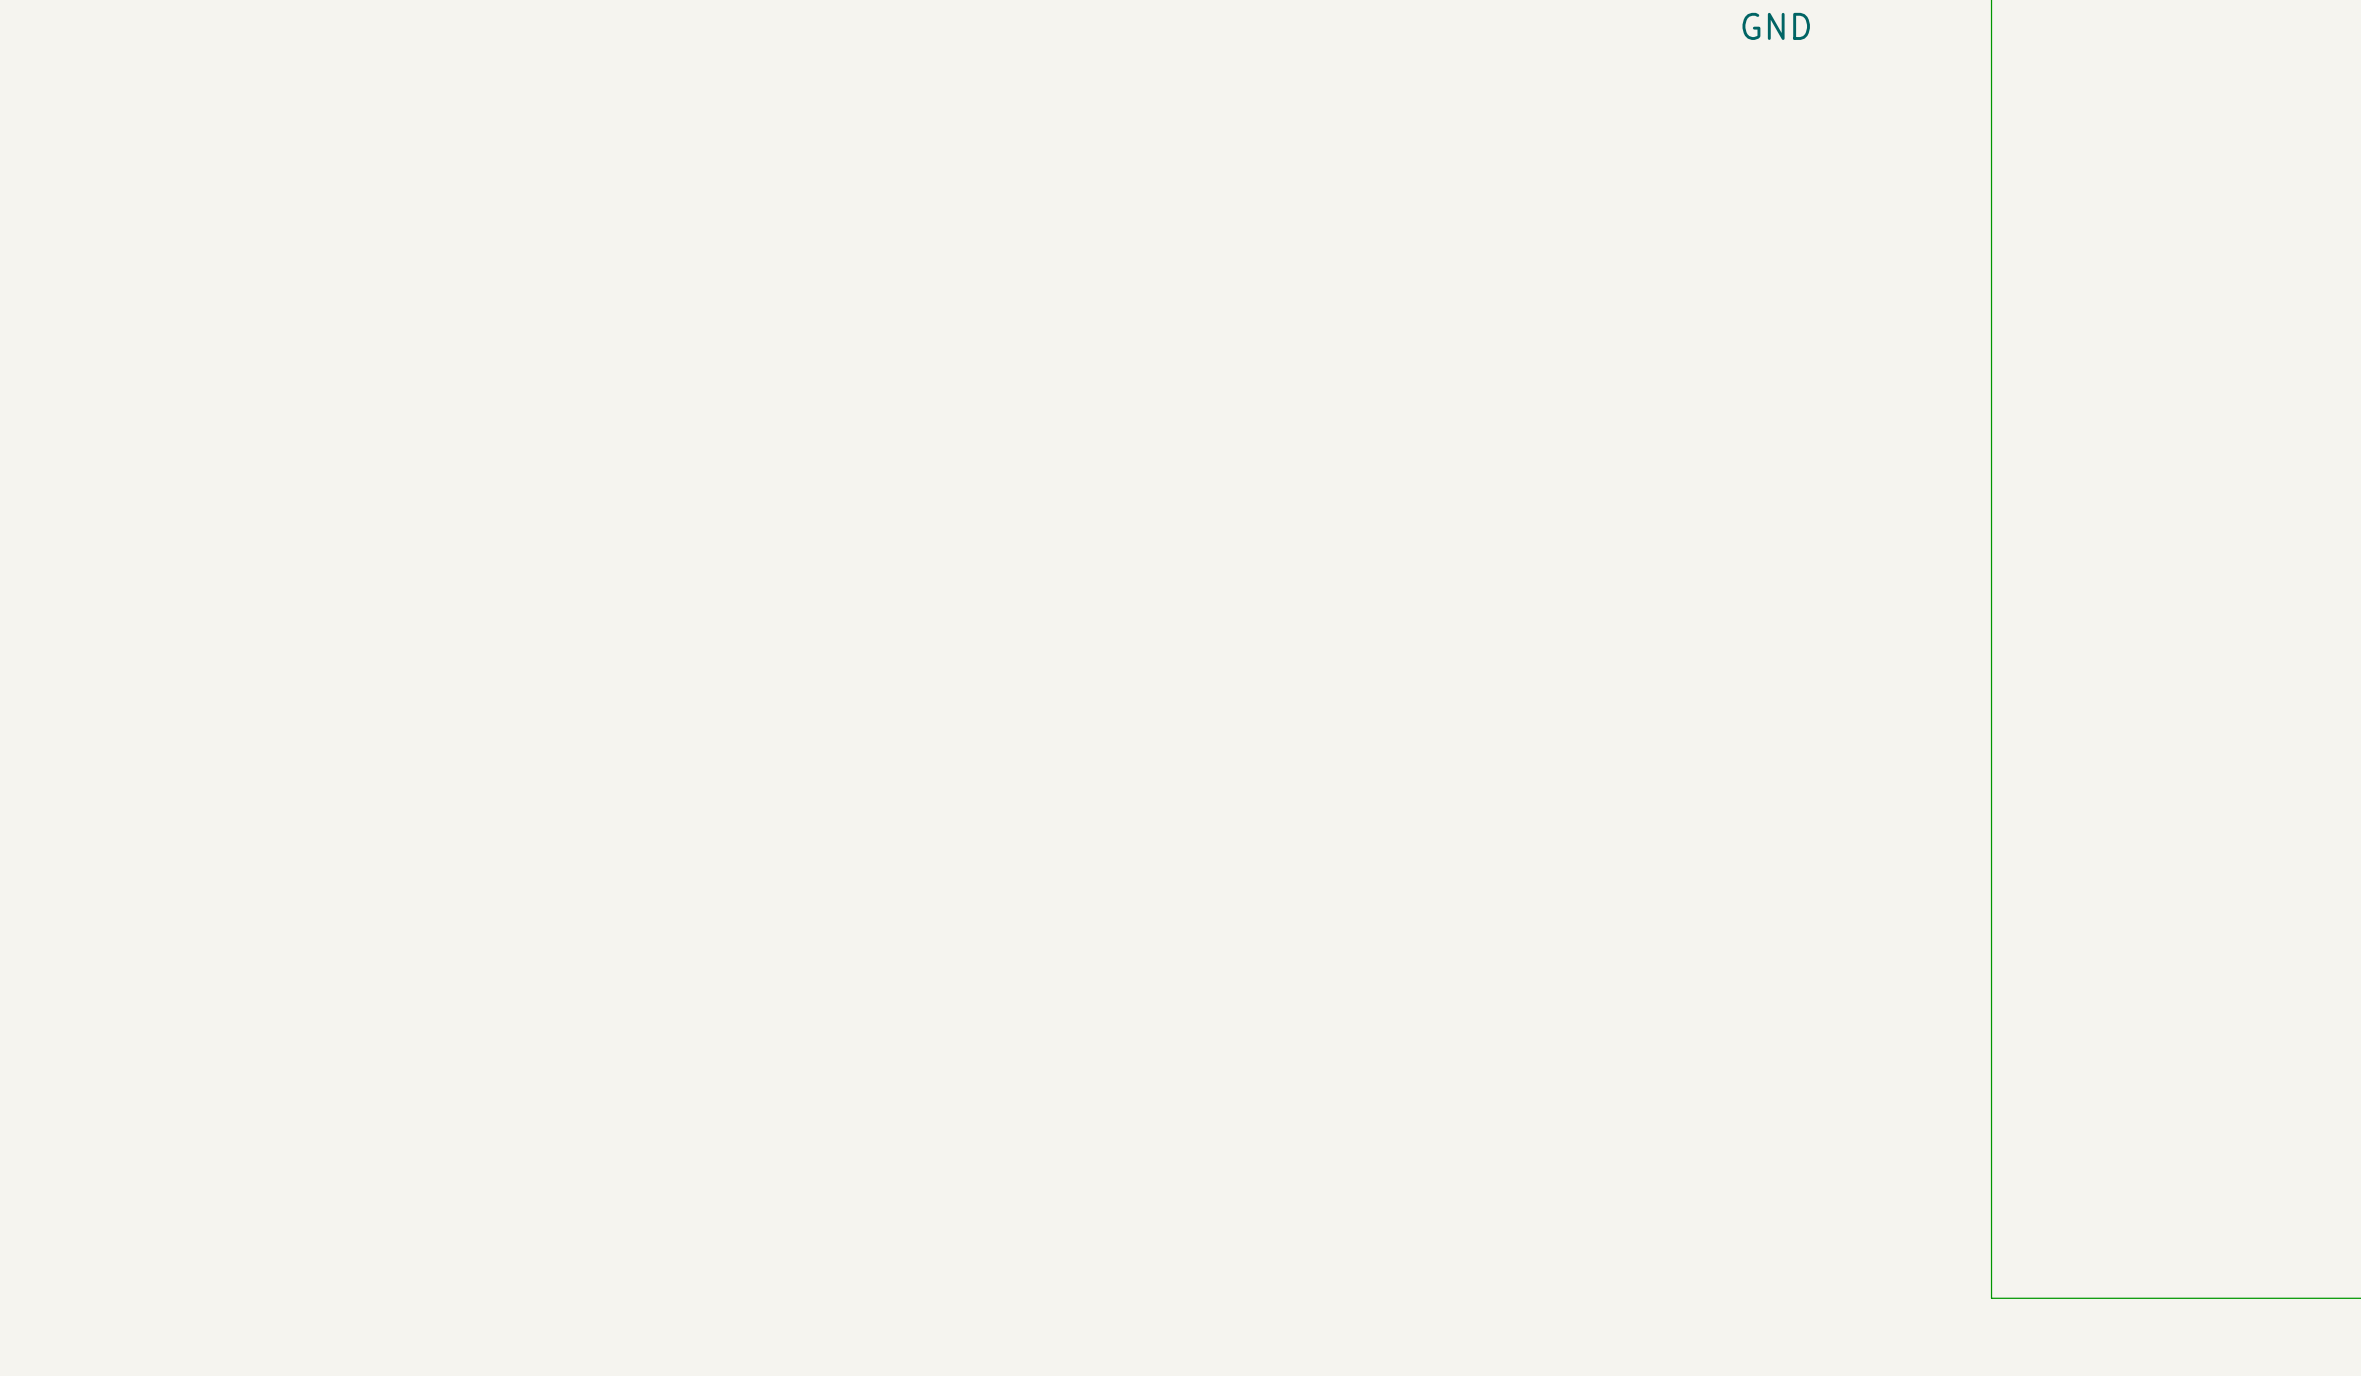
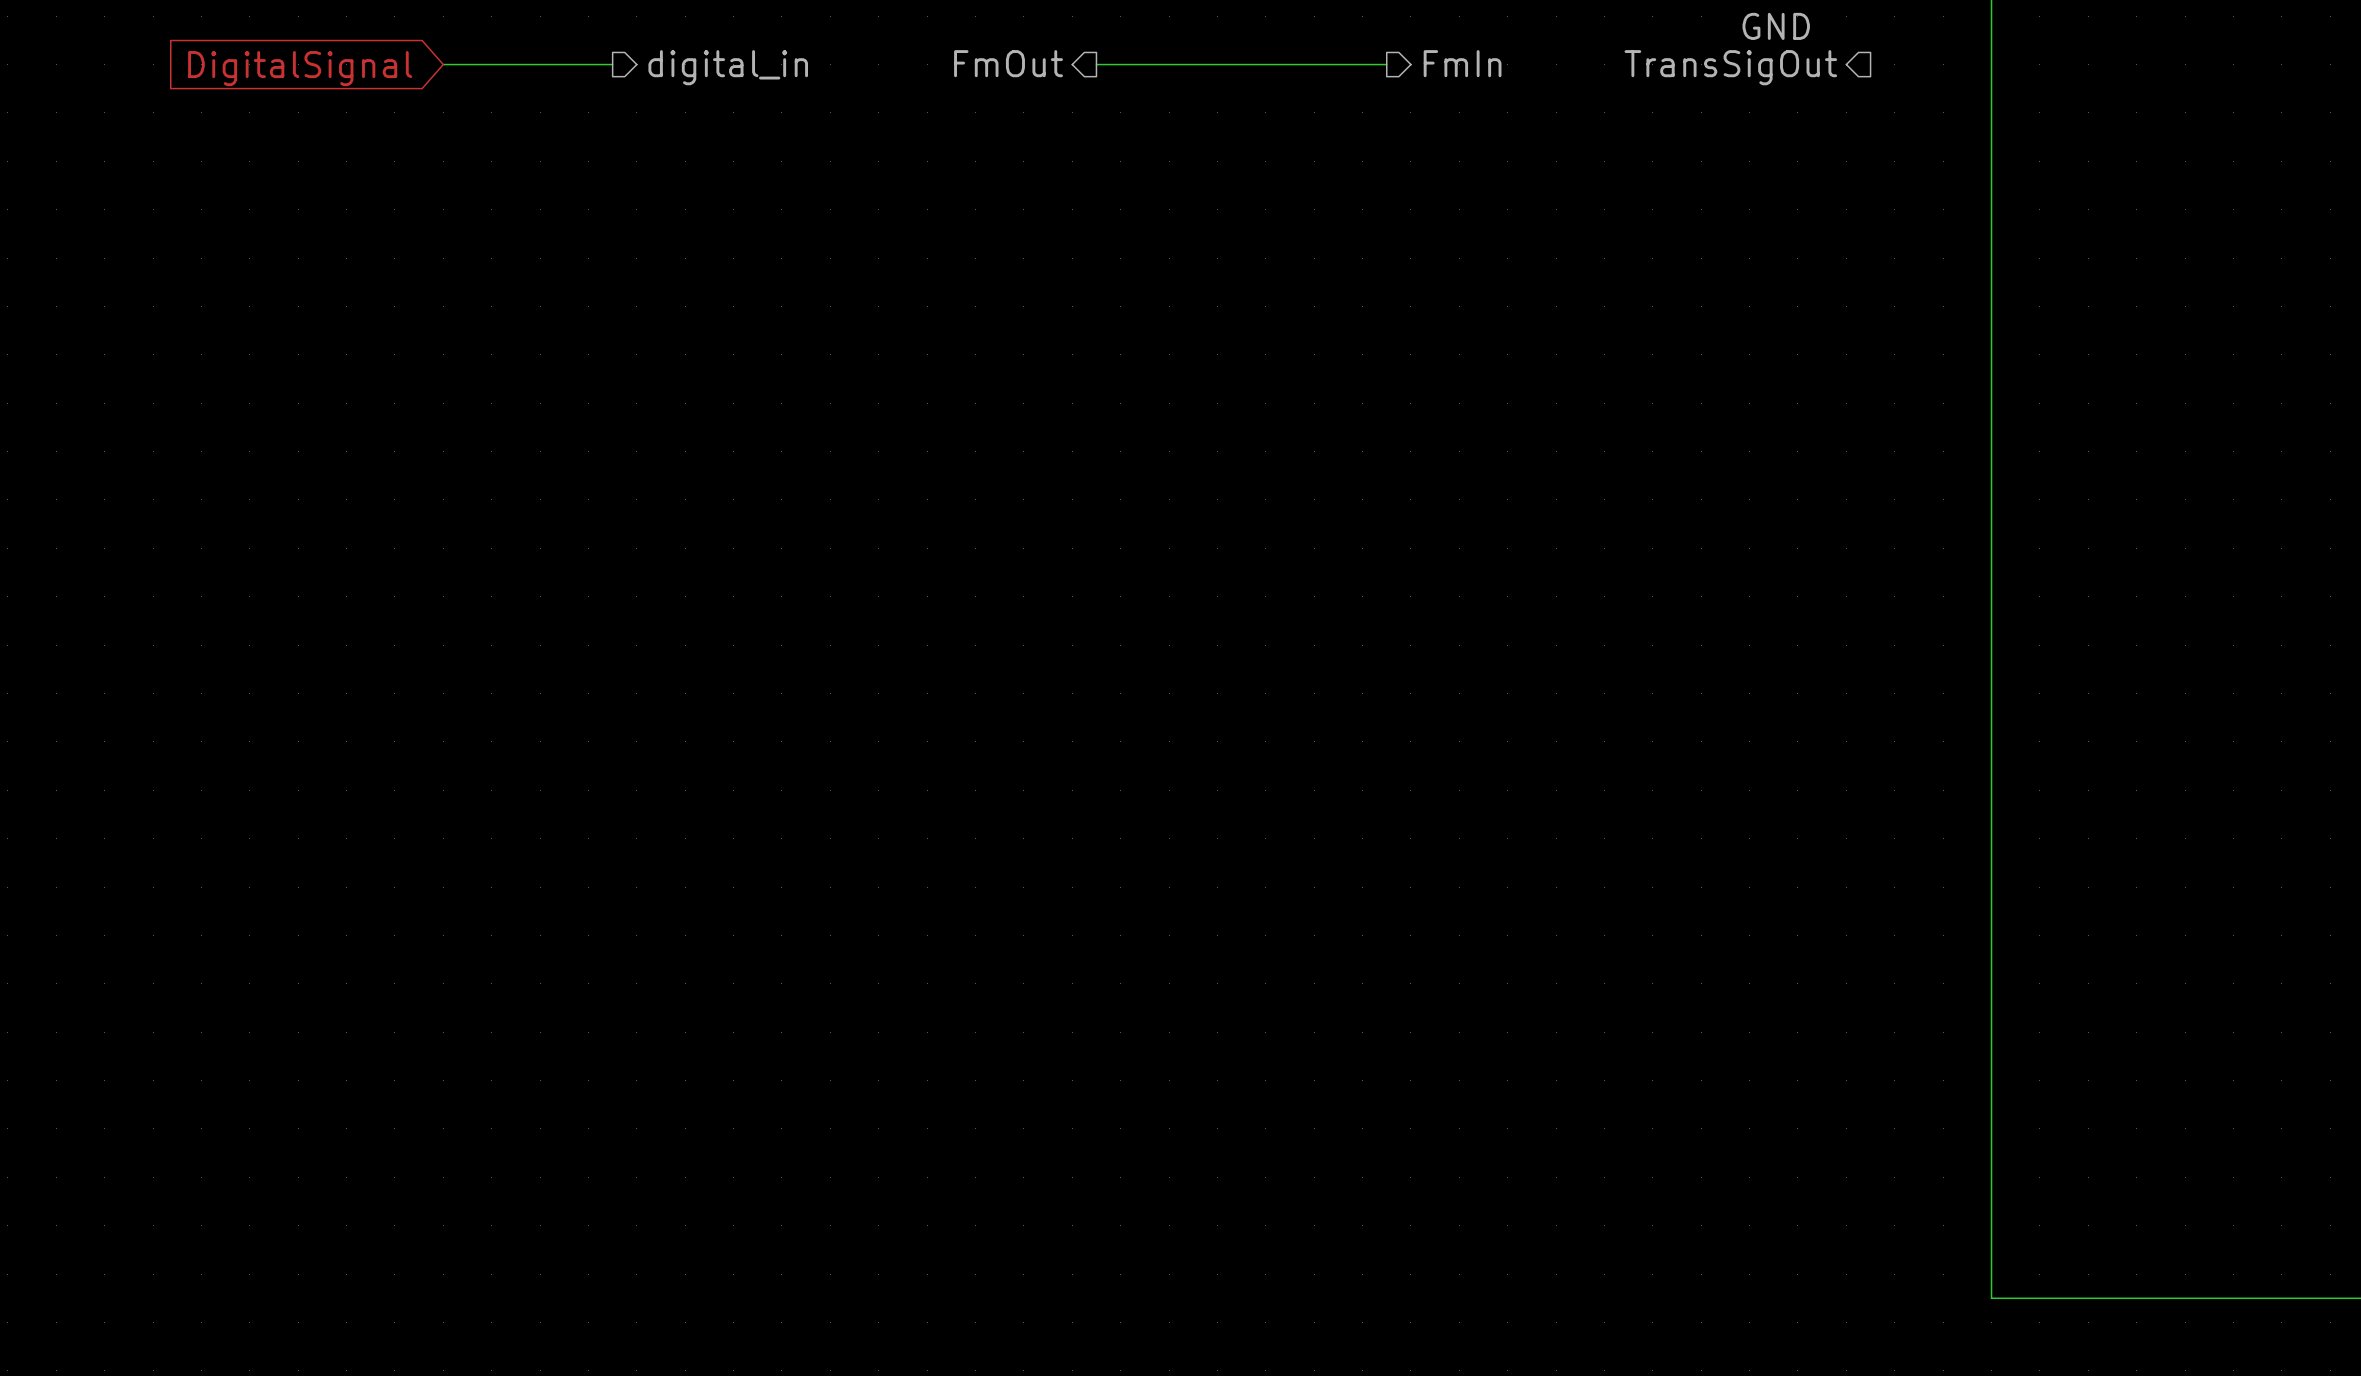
sheet pin: none -> FmOut (1008, 63)
sheet pin: none -> FmIn (1462, 63)
wire: none -> (443, 64) (612, 64)
wire: none -> (1096, 64) (1386, 64)
sheet pin: none -> digital_in (728, 67)
sheet pin: none -> TransSigOut (1730, 67)
global label: none -> DigitalSignal (300, 68)

